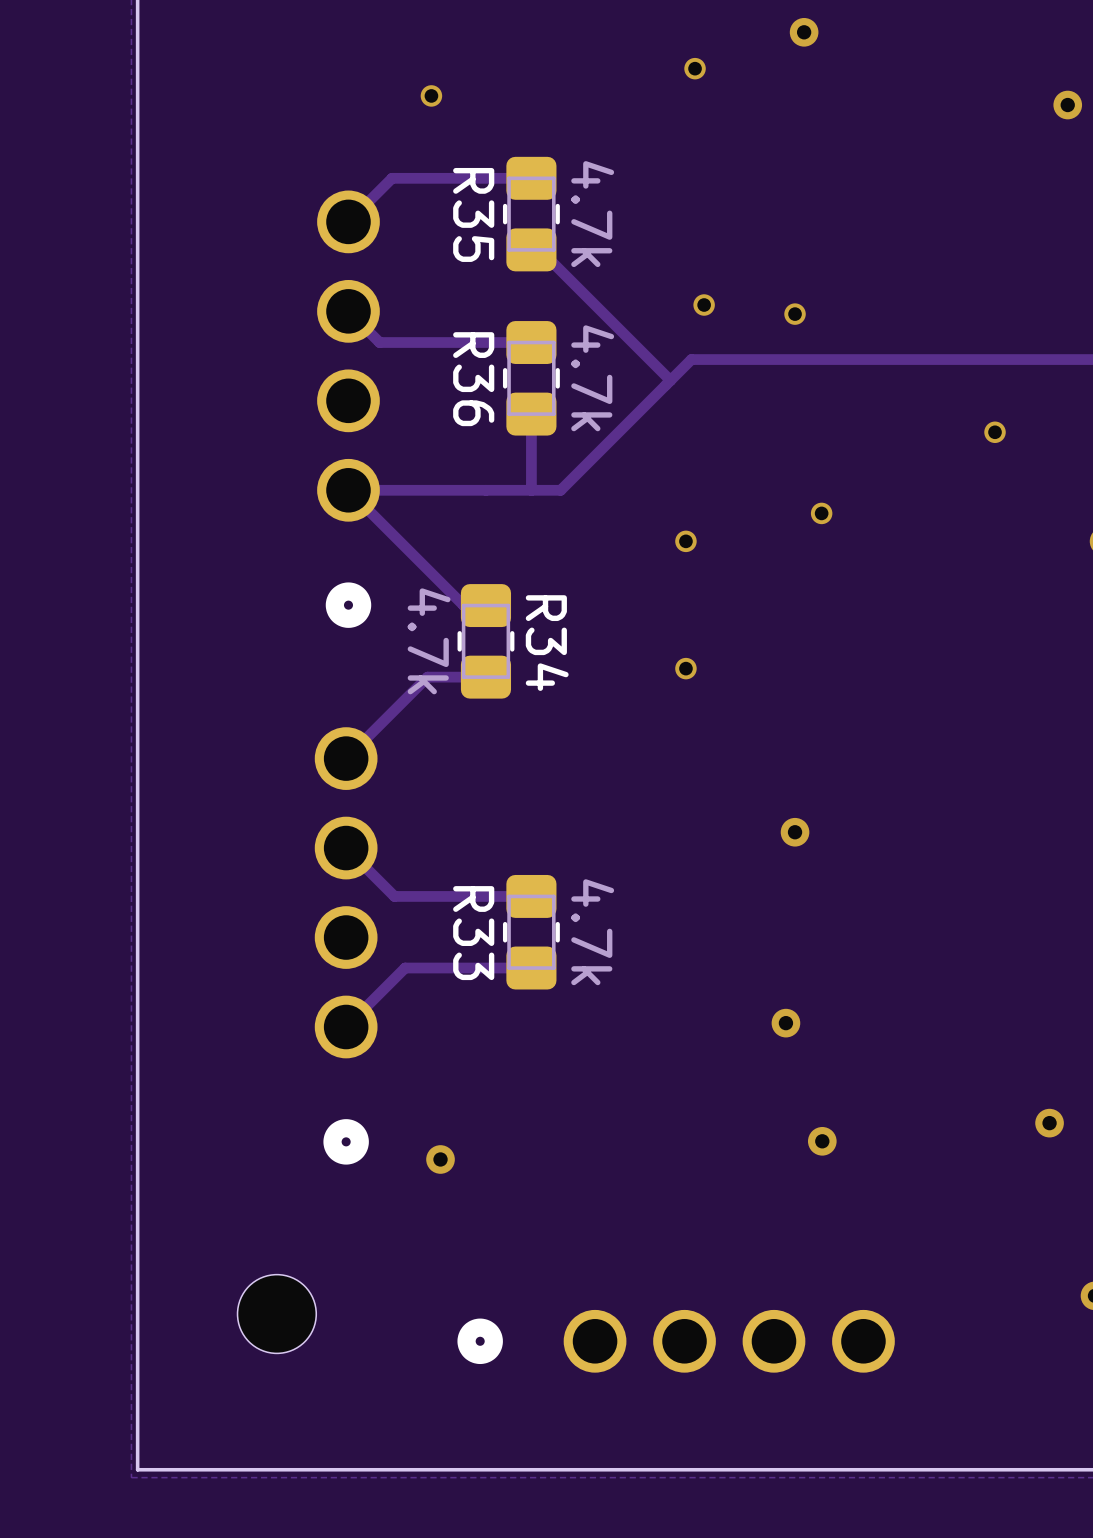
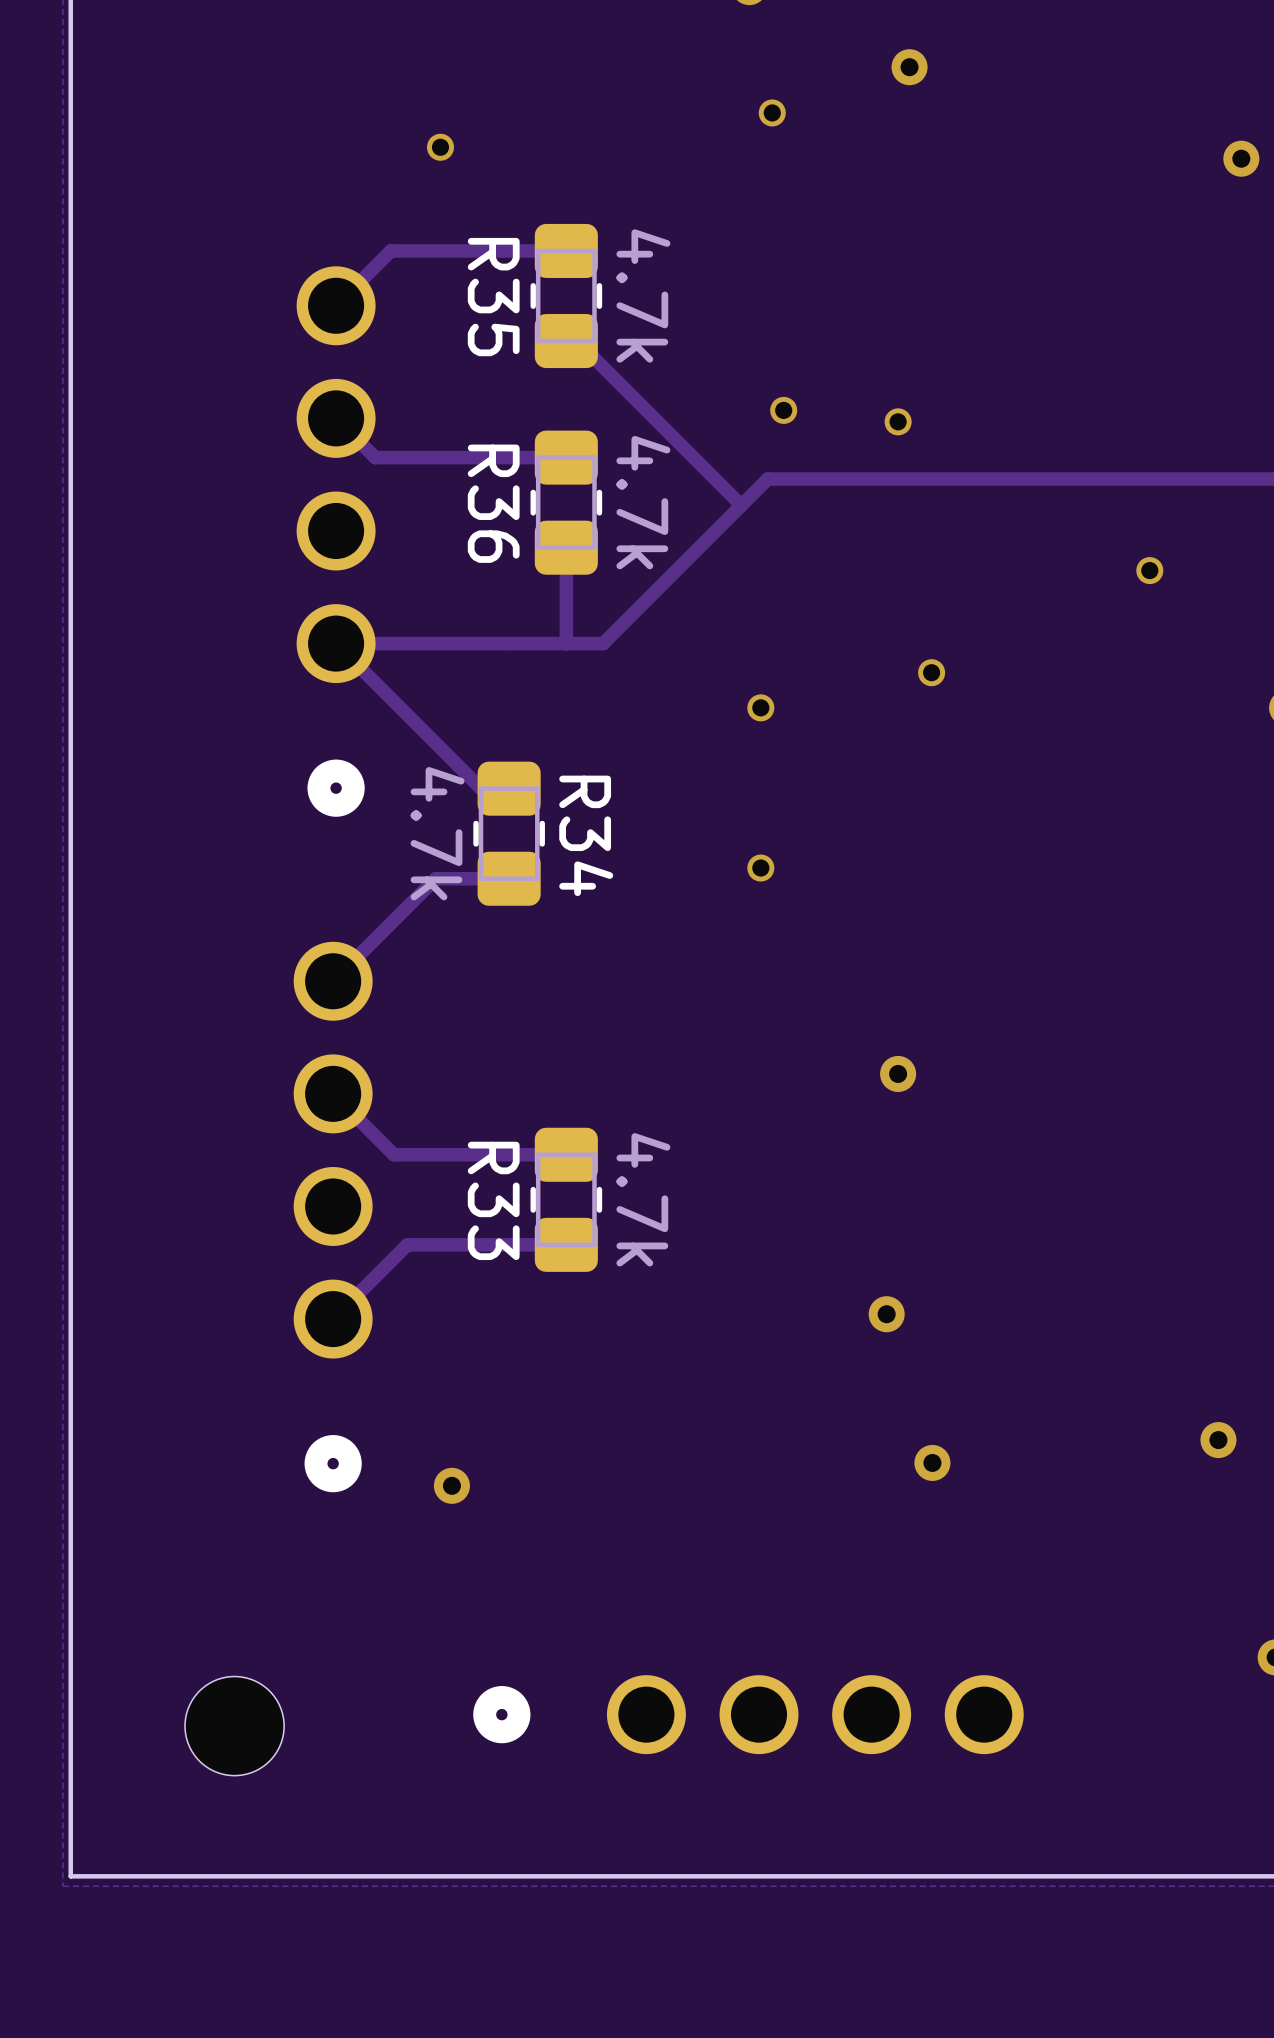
part position: (276, 1314) -> (234, 1726)

